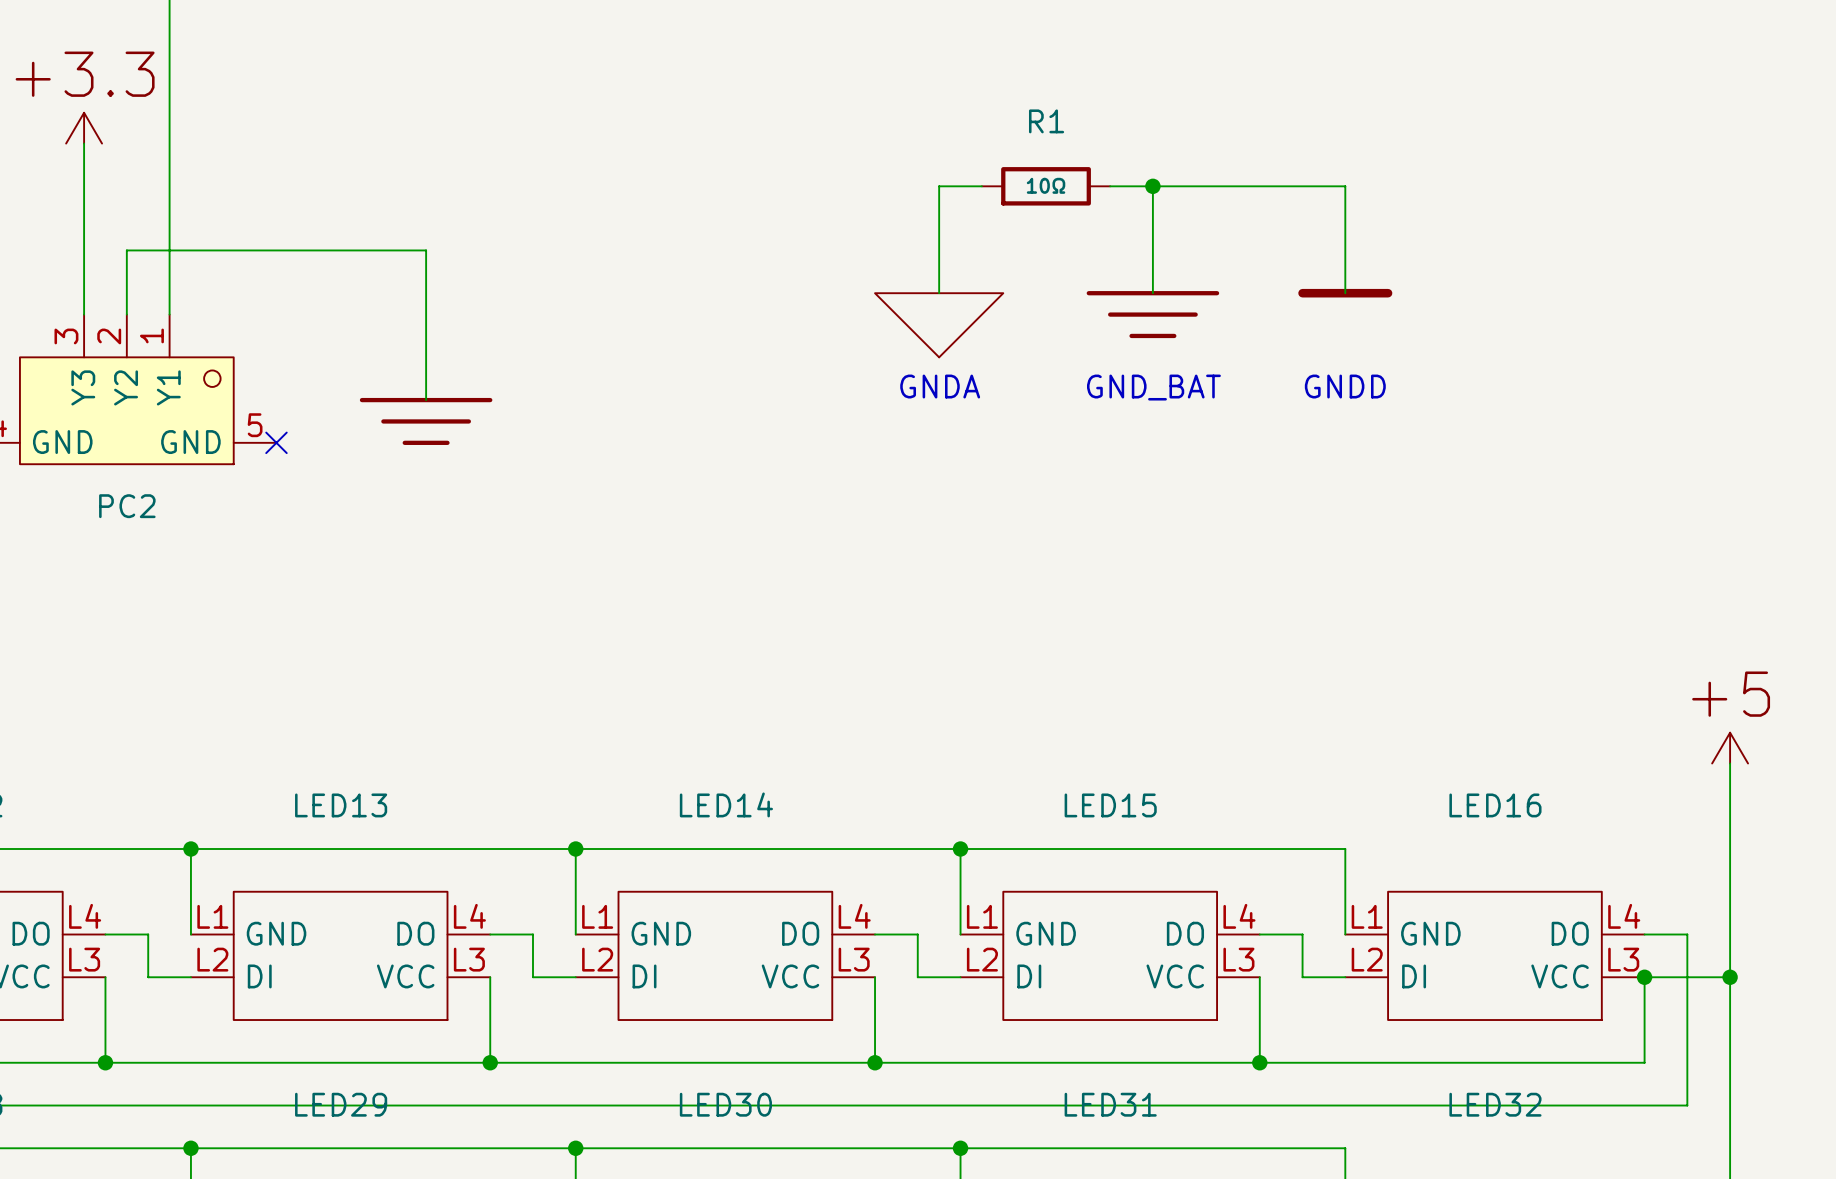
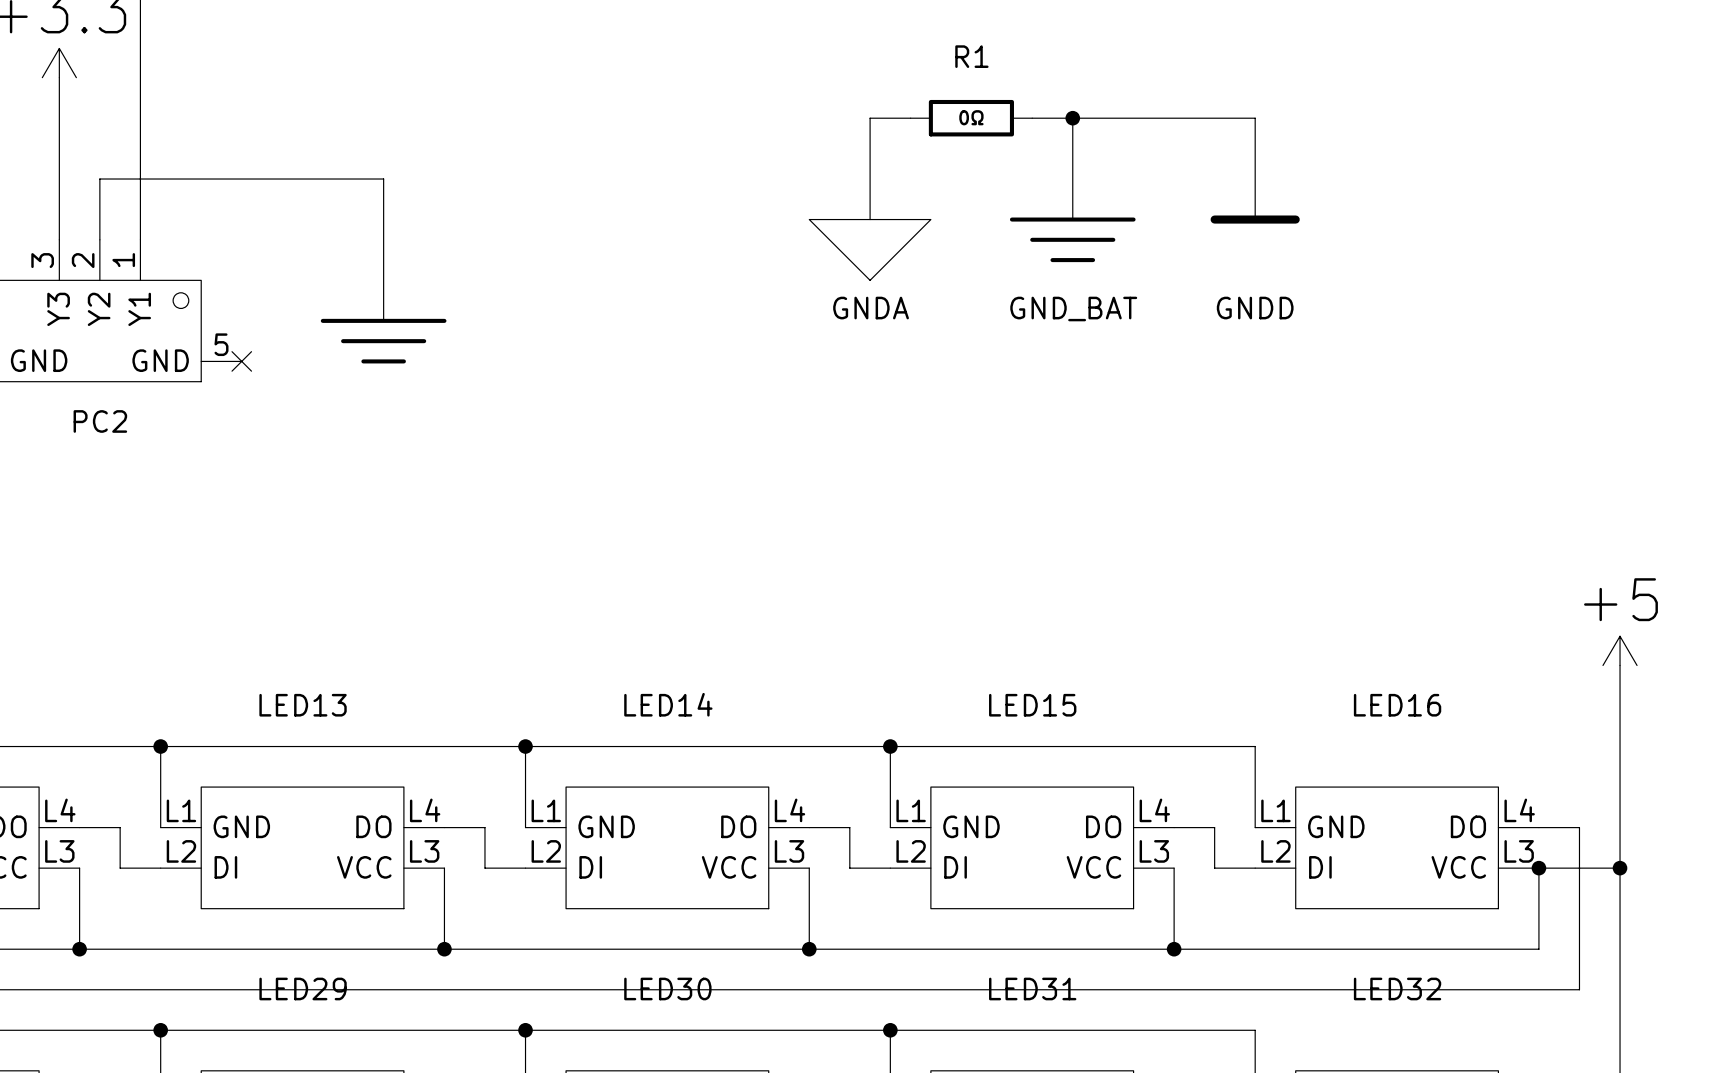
R1 value: 10Ω (1046, 185) -> 0Ω (971, 117)

